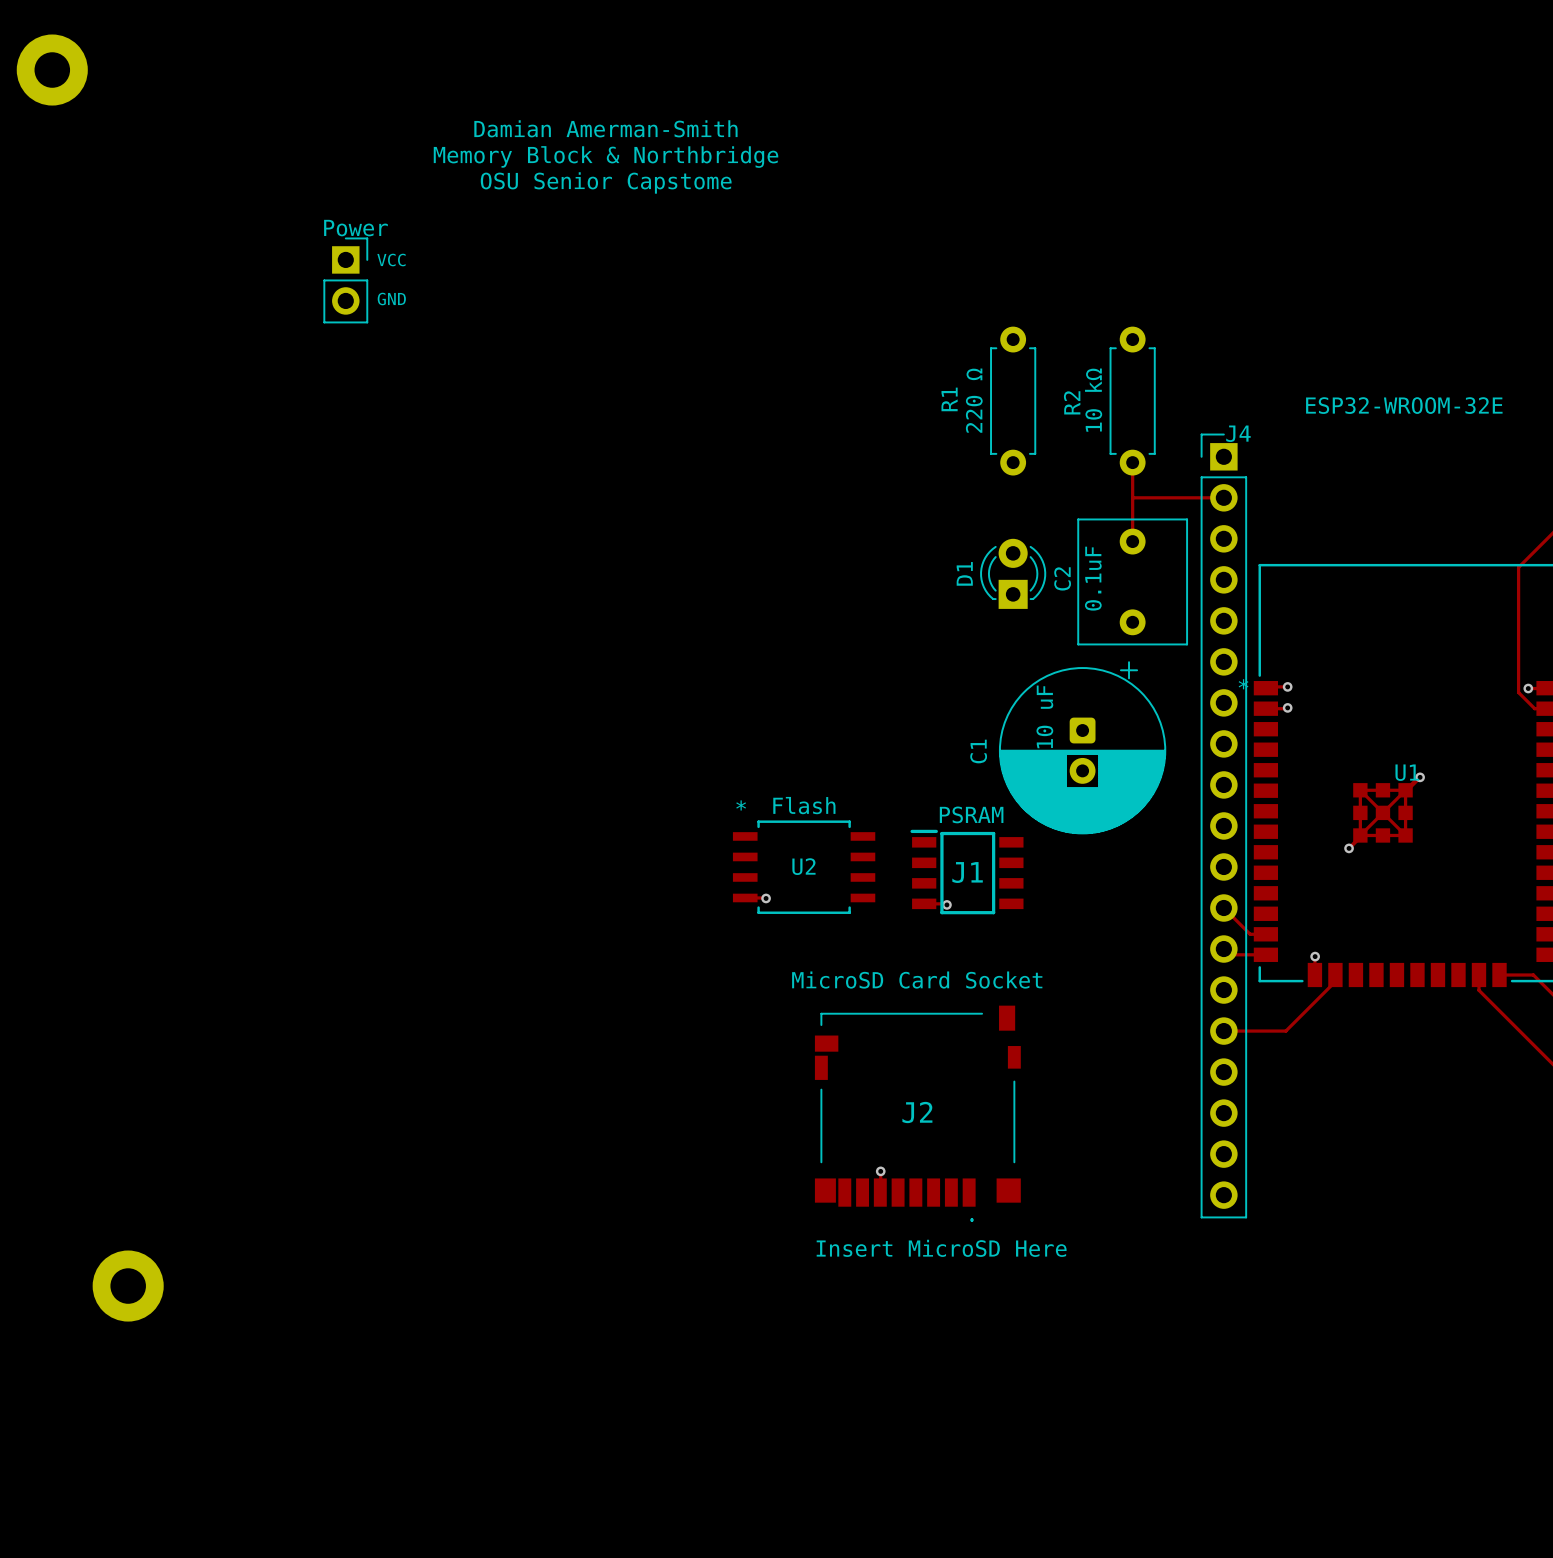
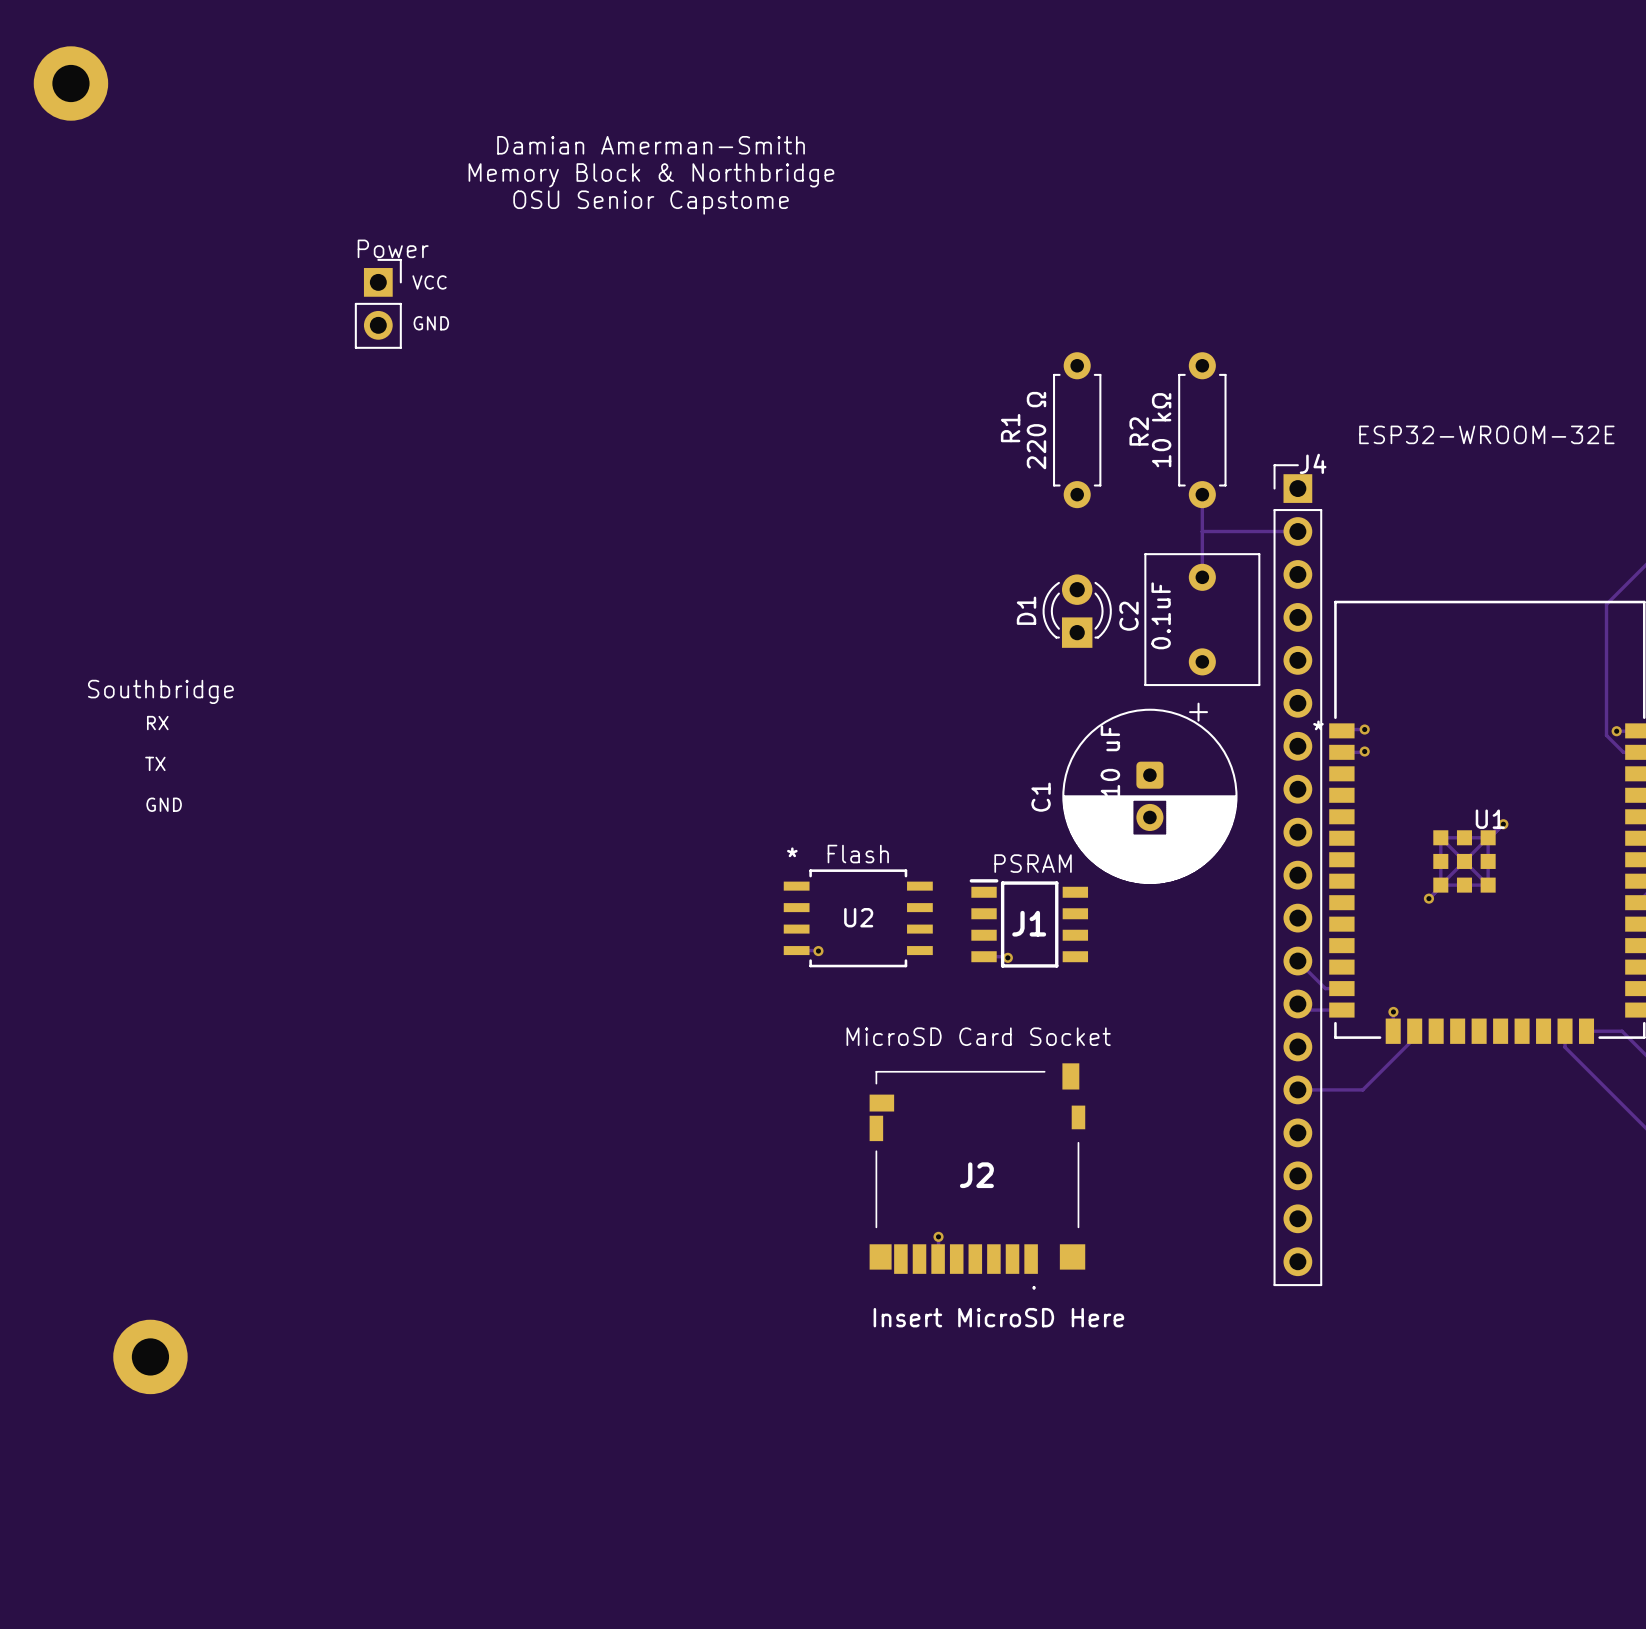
text: none -> Southbridge (160, 691)
text: none -> RX (157, 723)
text: none -> TX (155, 763)
text: none -> GND (164, 804)

